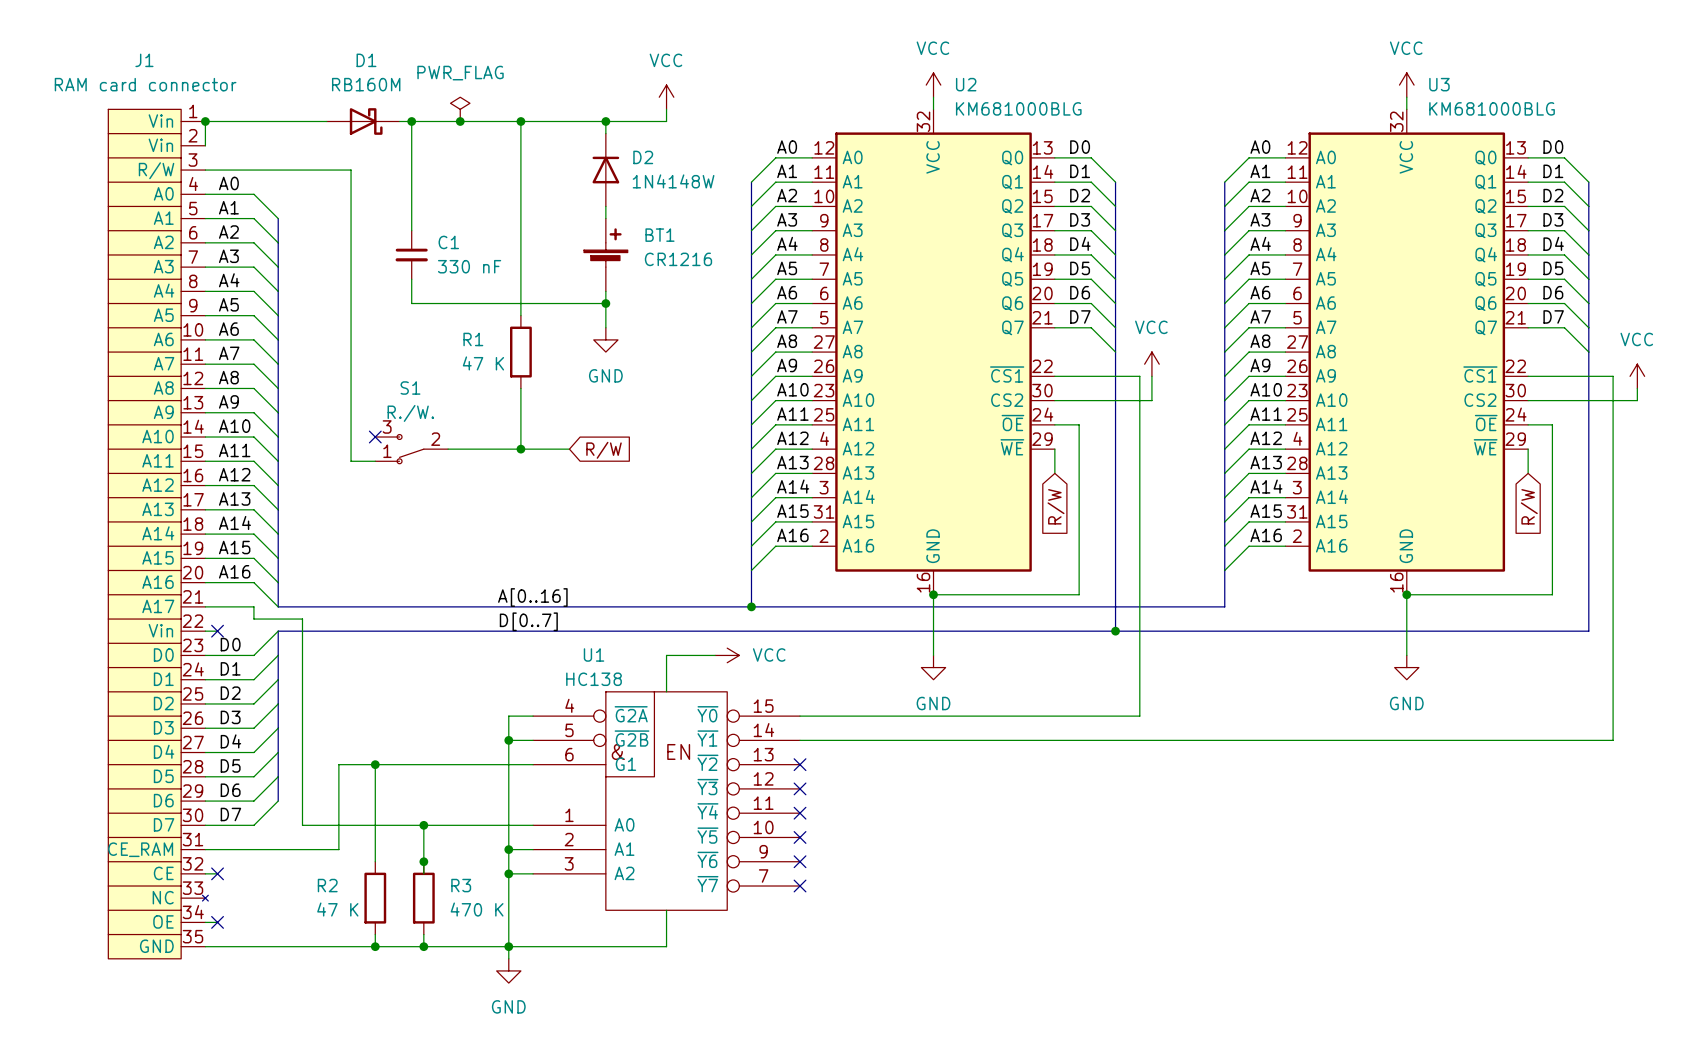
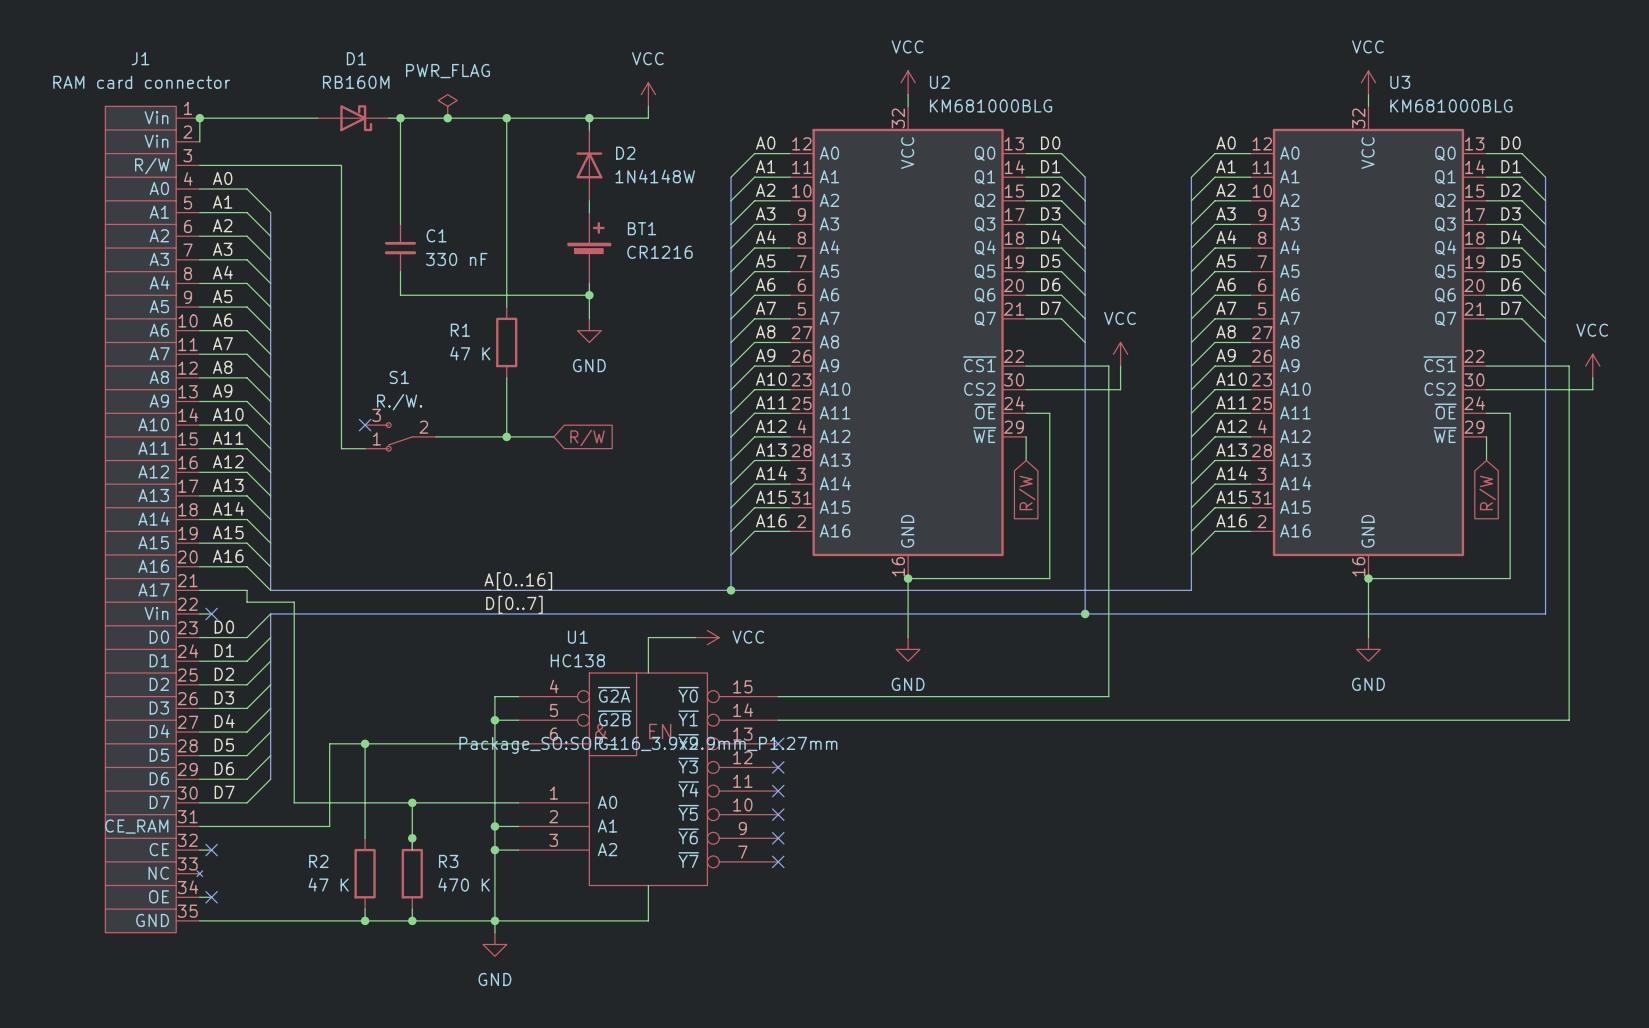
U1 text: none -> Package_SO:SOP-16_3.9x9.9mm_P1.27mm (648, 745)

